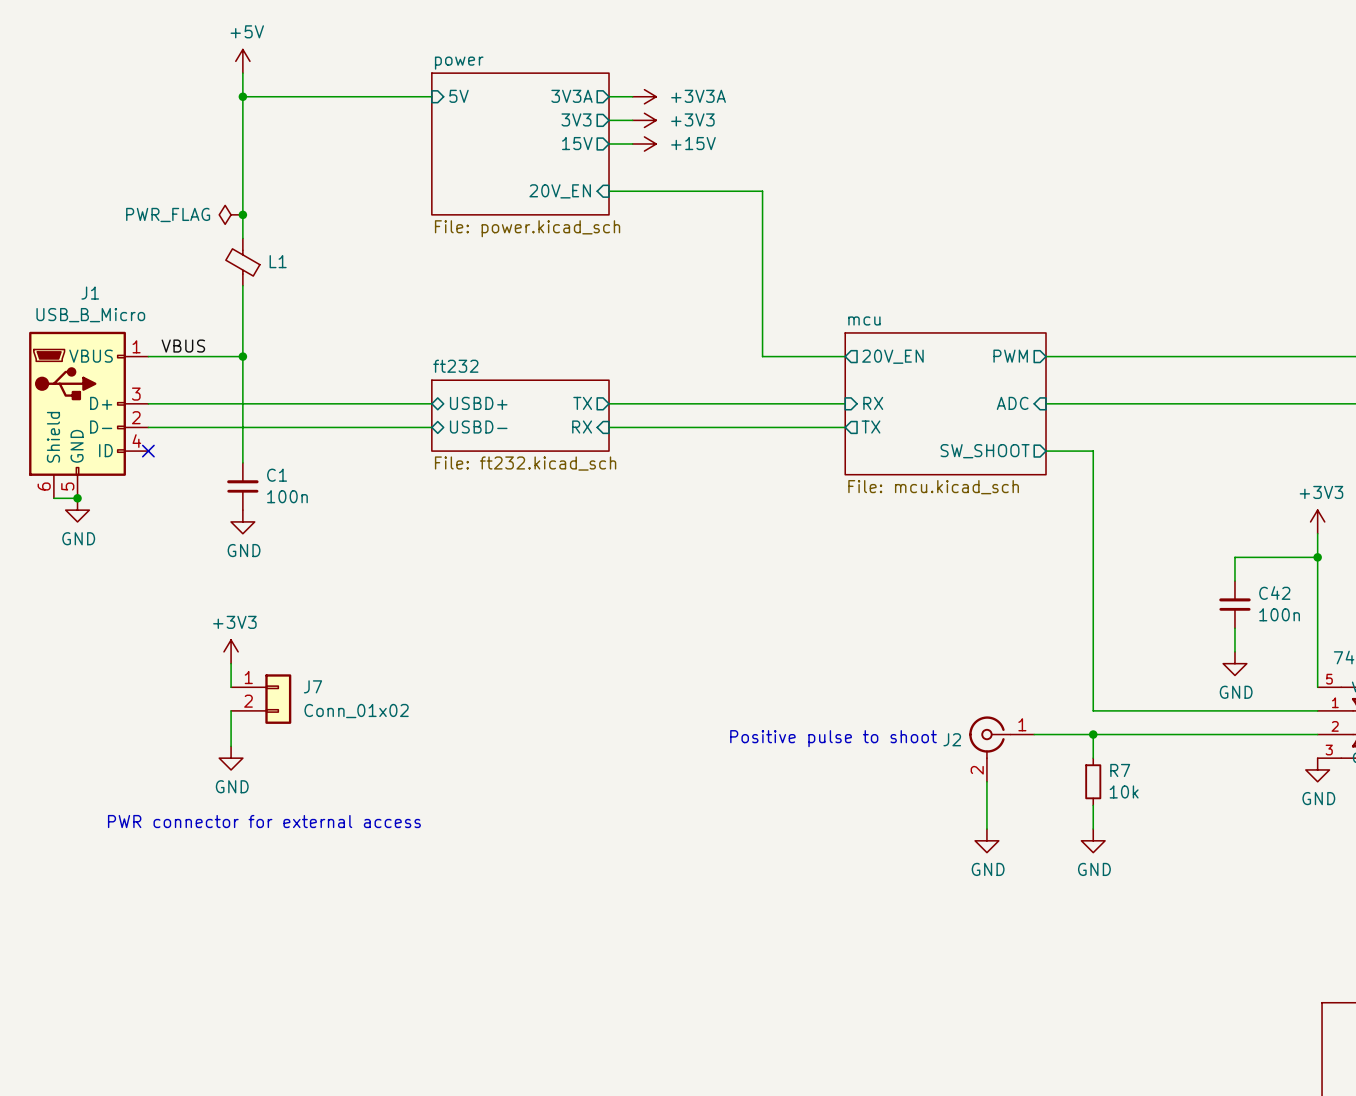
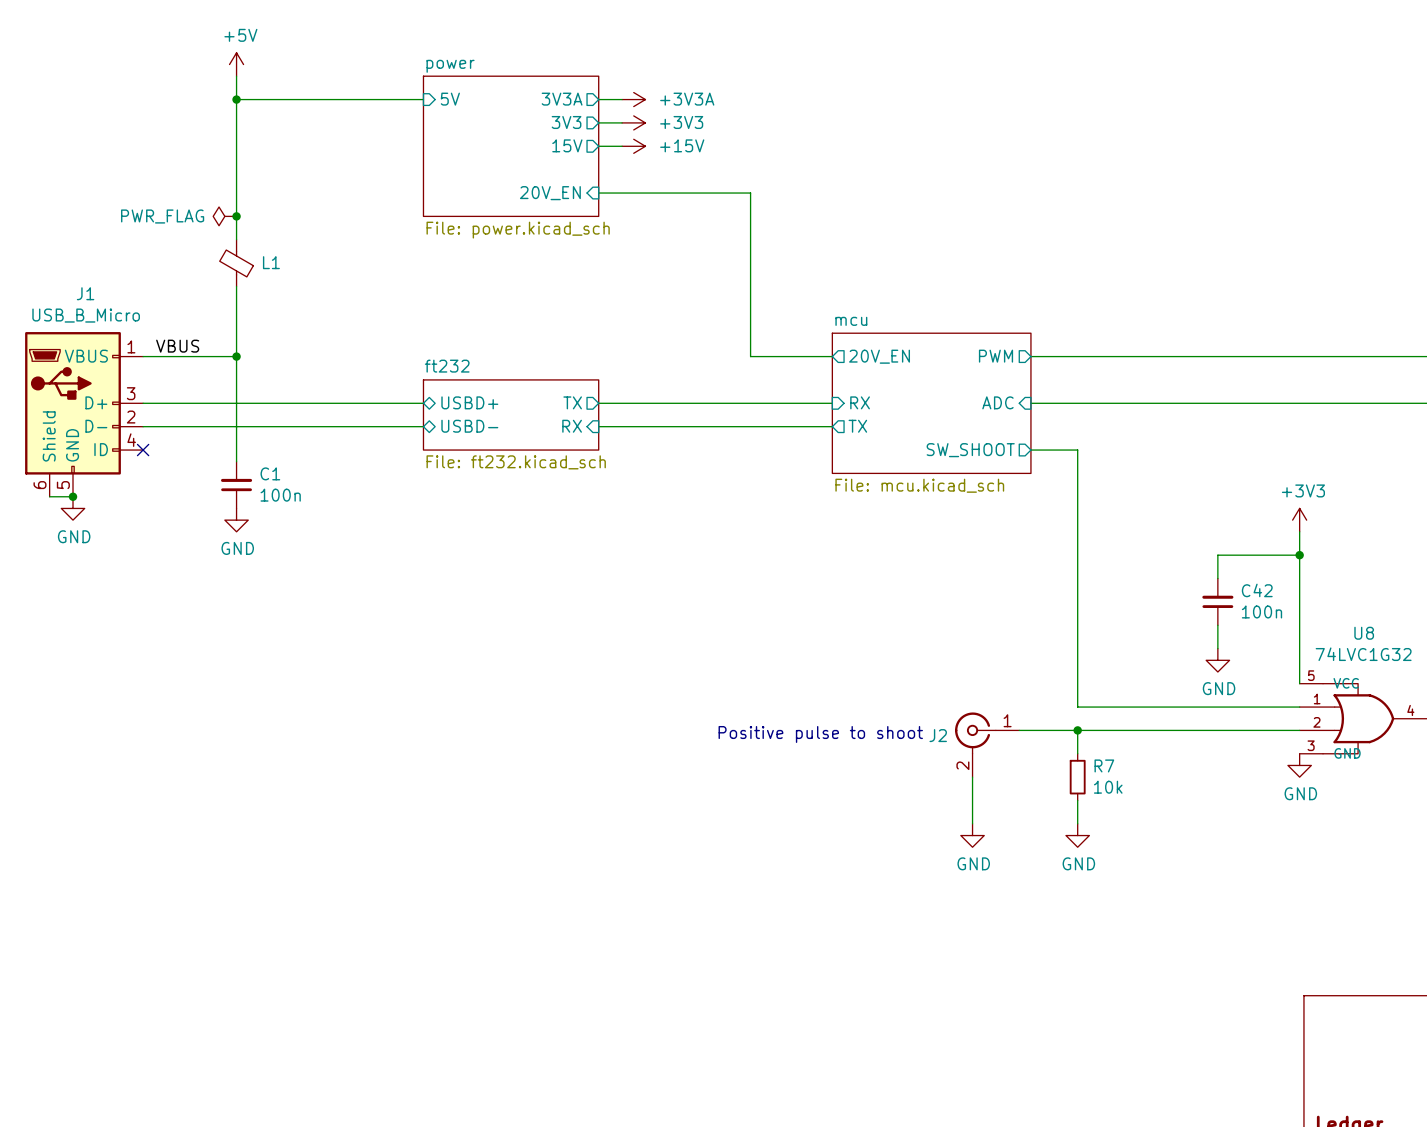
power symbol: +3V3 (231, 651) -> none
wire: (231, 663) (231, 687) -> none
J7: Conn_01x02 (261, 699) -> none
wire: (231, 710) (231, 746) -> none
power symbol: GND (231, 758) -> none
text: PWR connector for external access (264, 821) -> none

